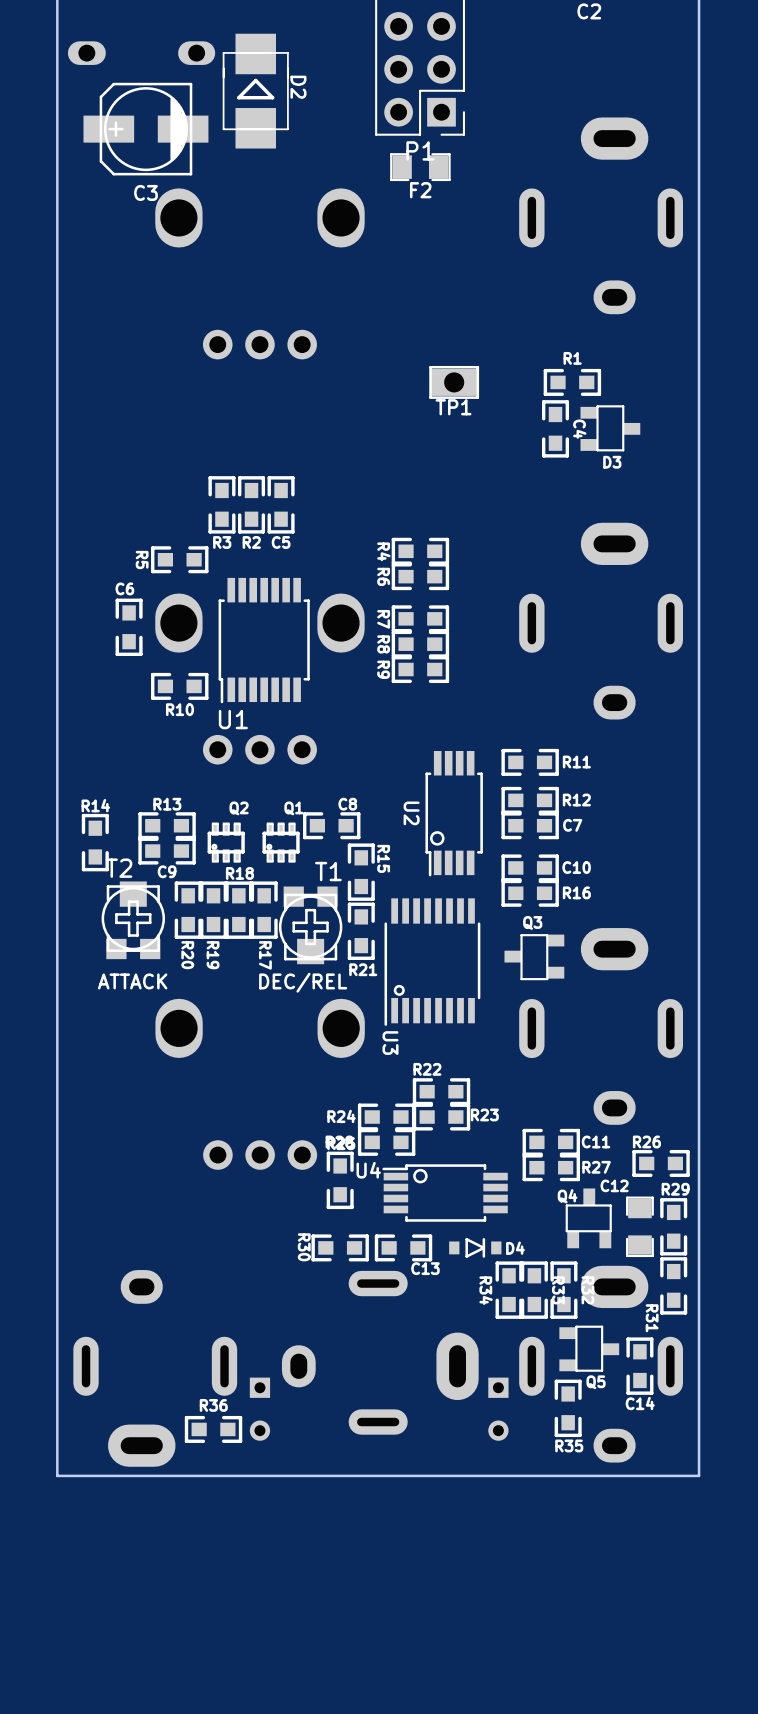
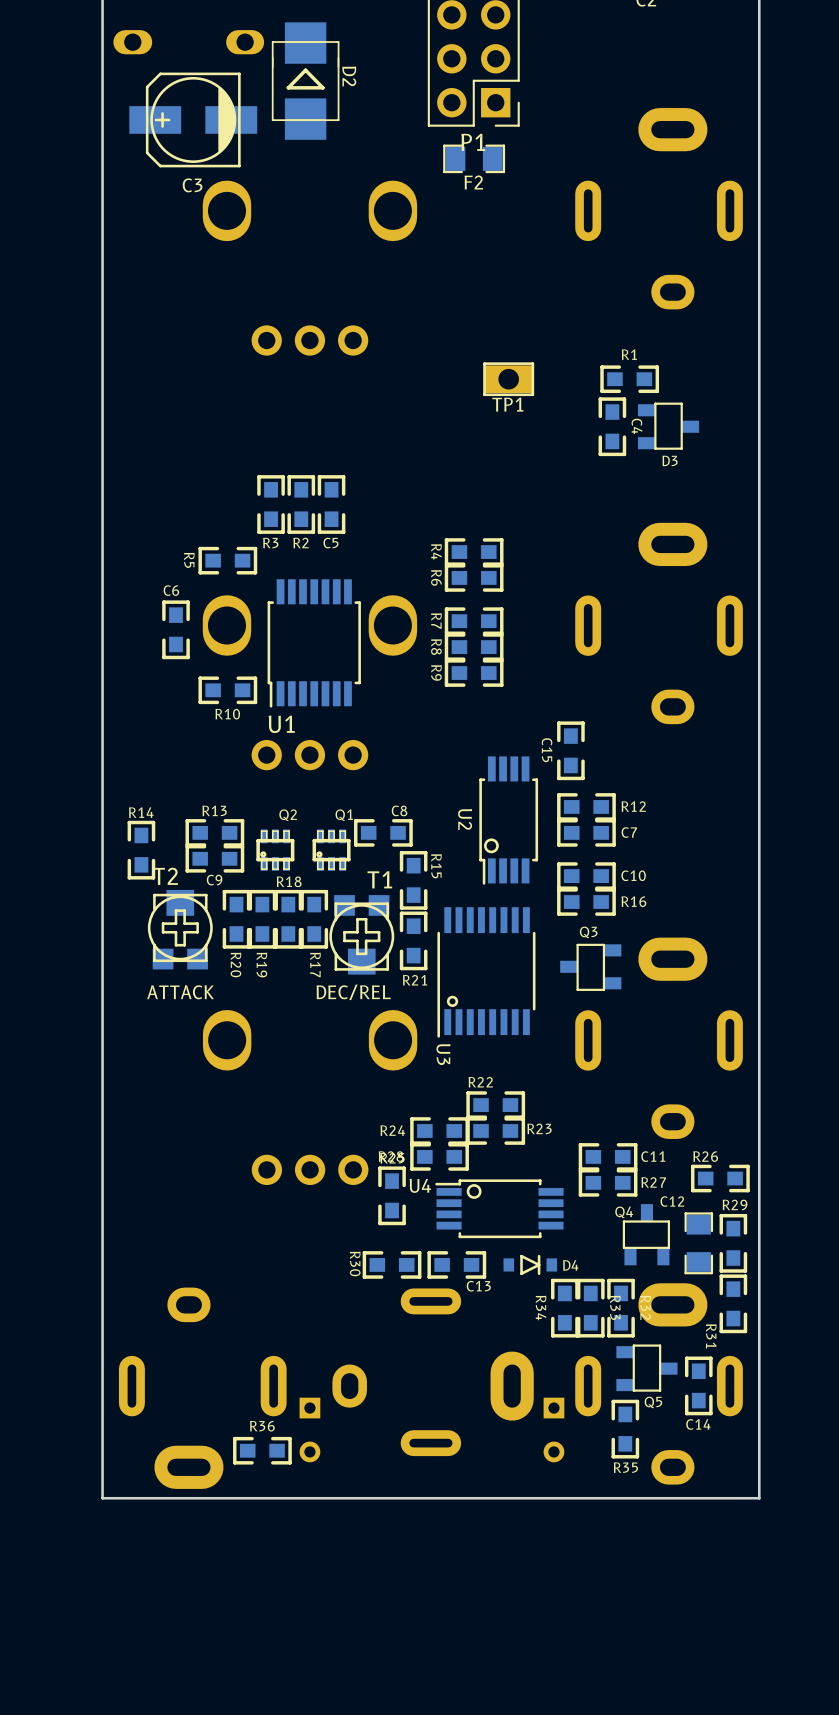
C15: none -> (570, 750)
R11: (530, 762) -> none

